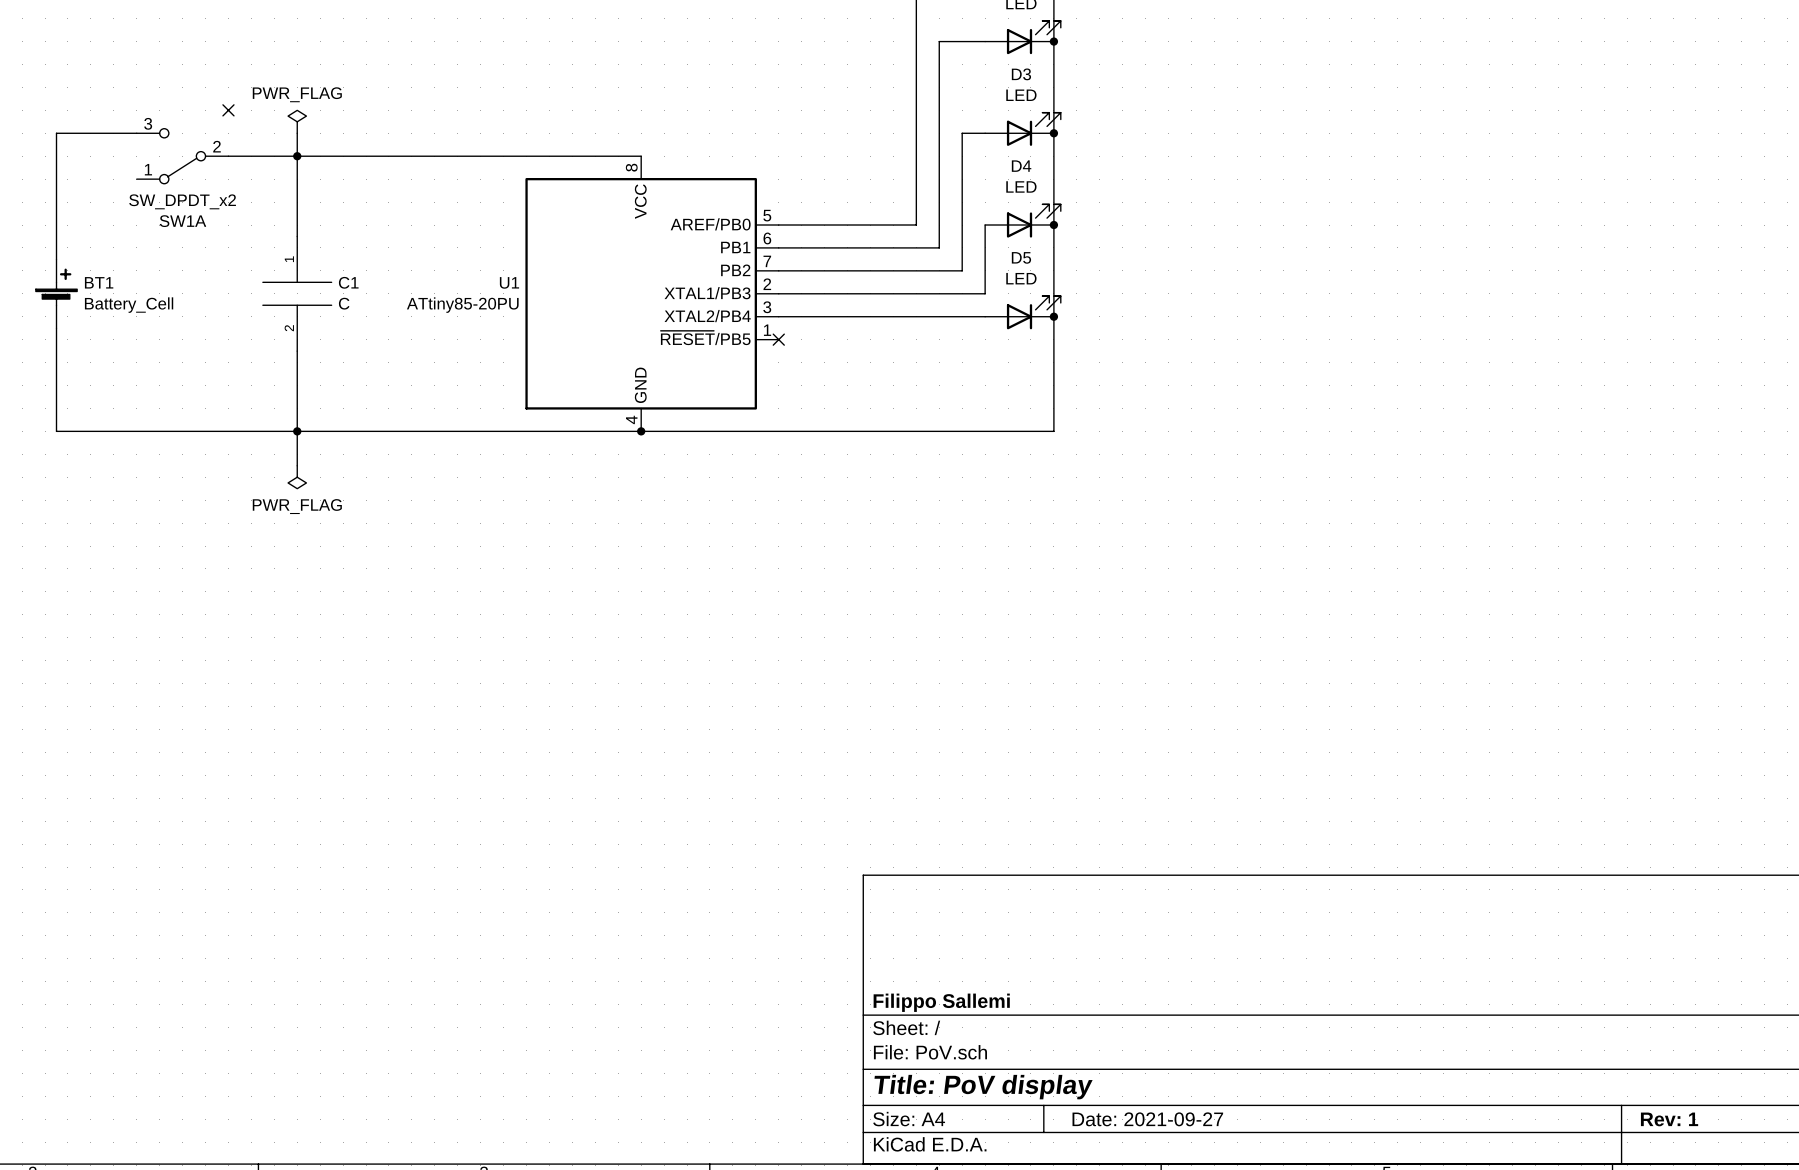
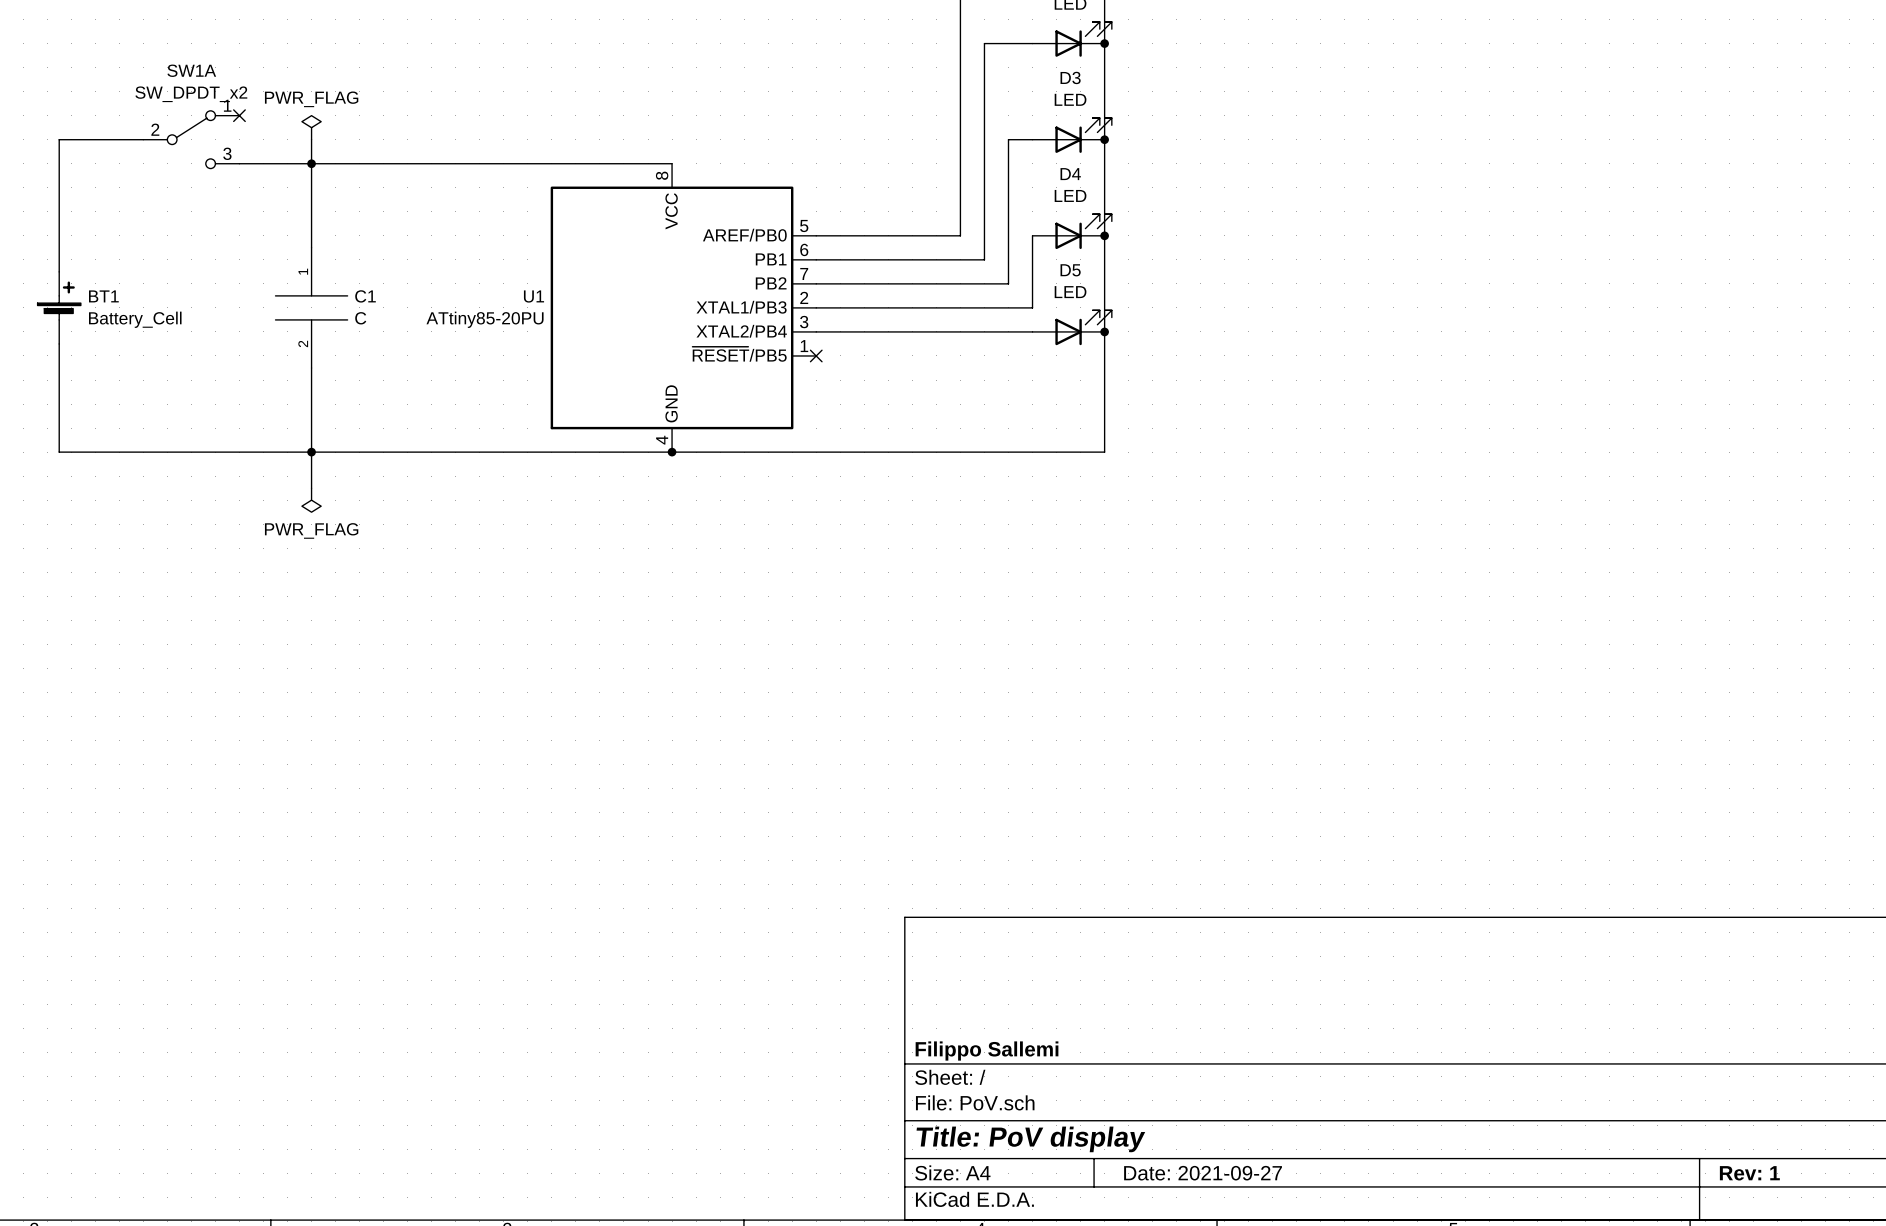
SW1A rotation: 0° (182, 156) -> 180° (191, 139)

